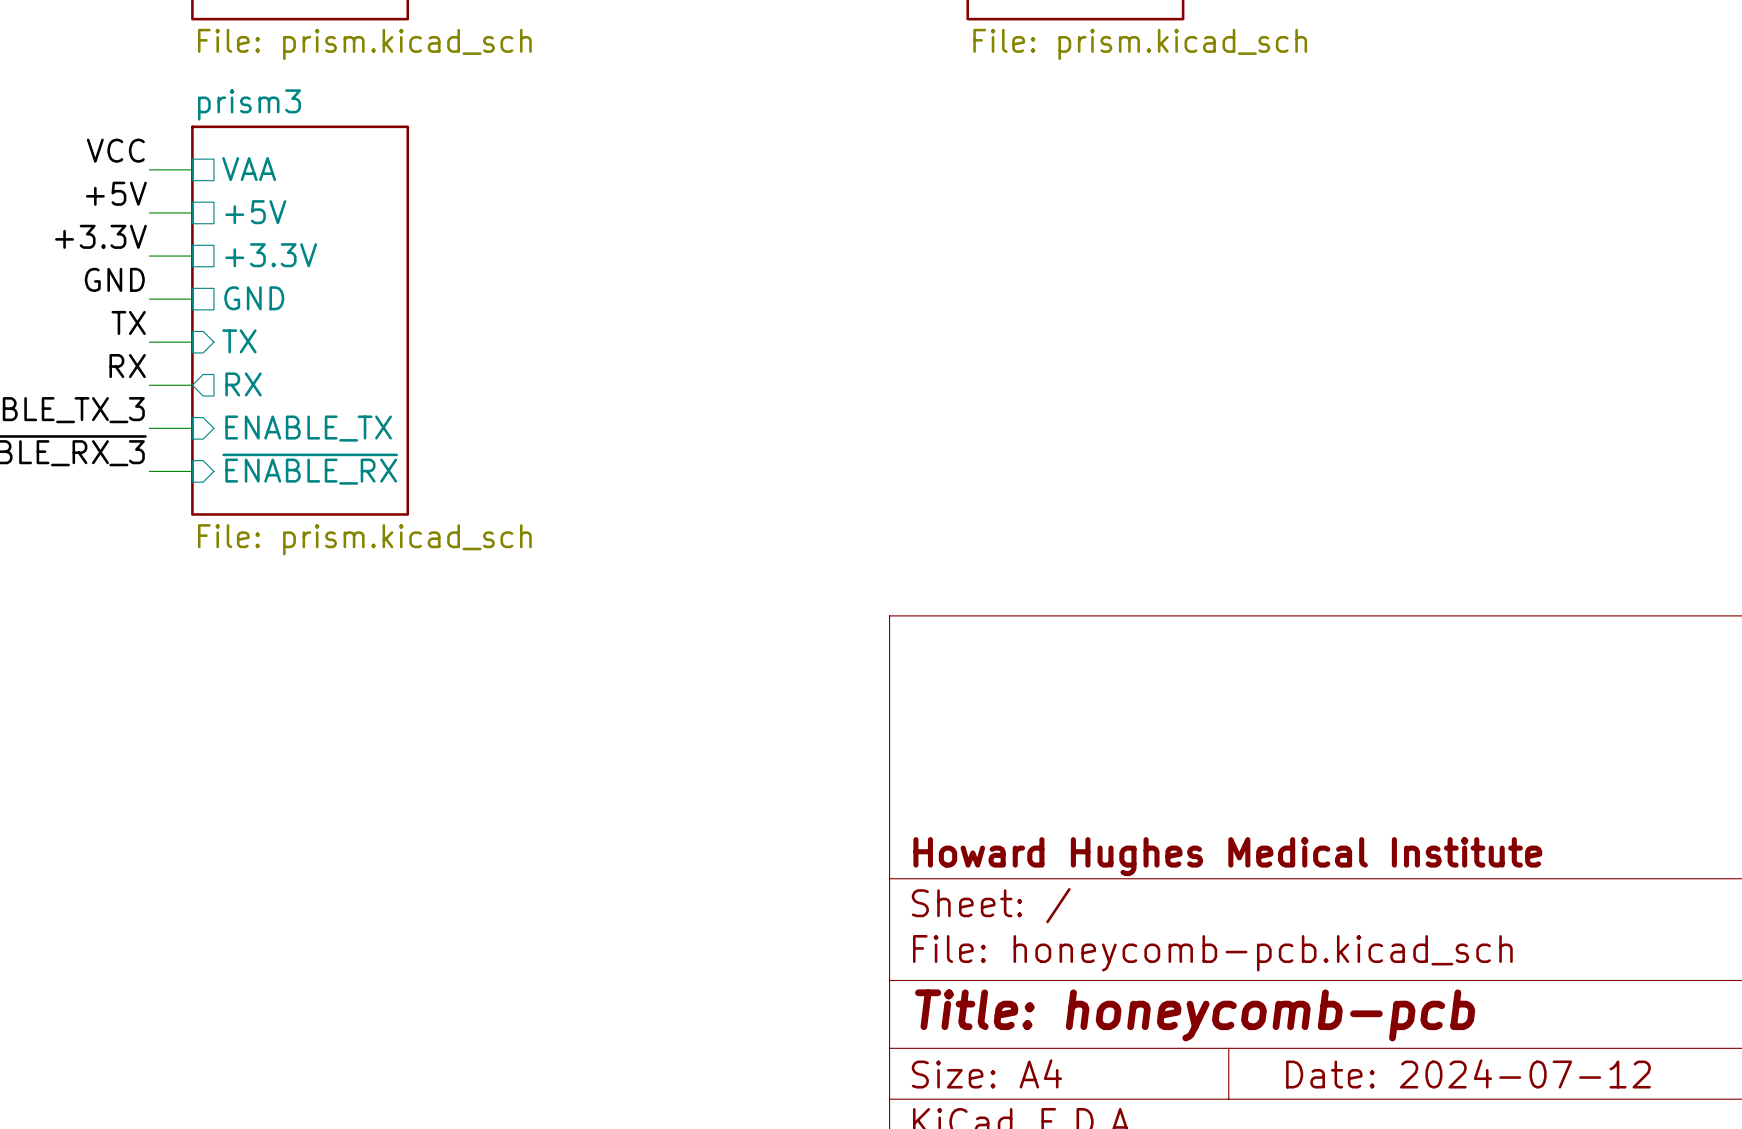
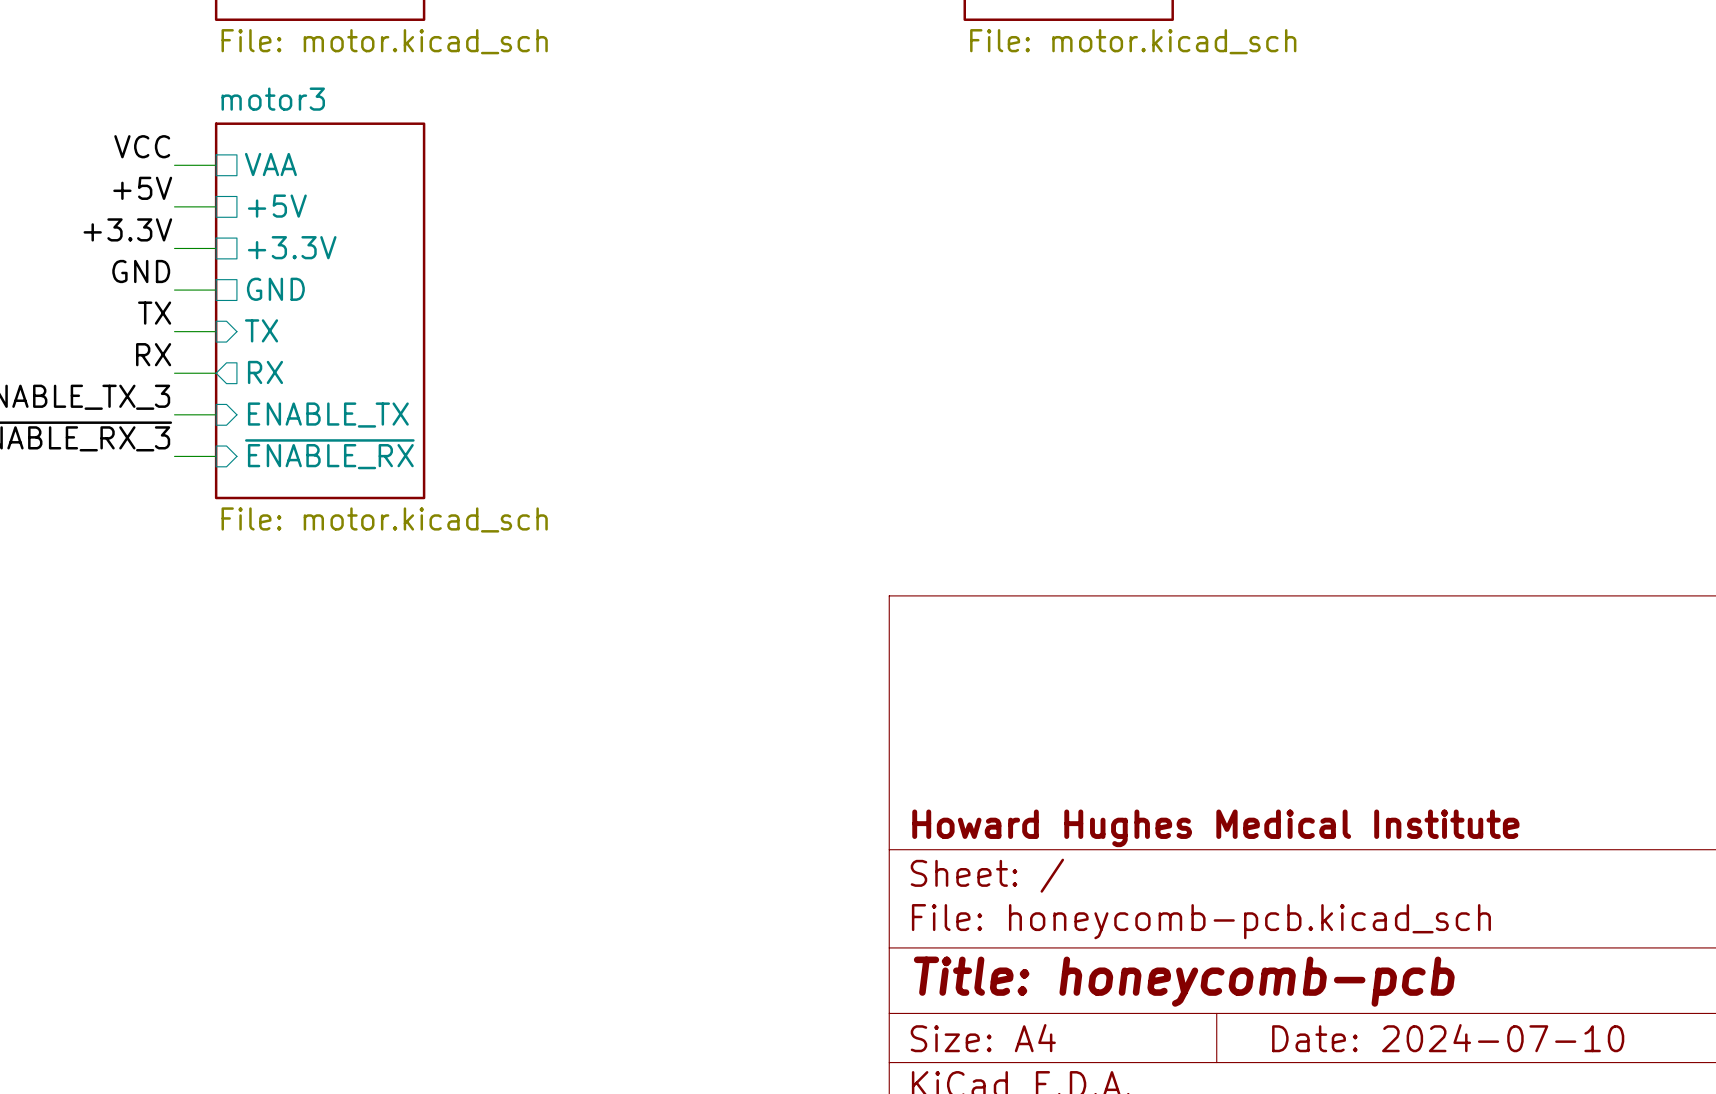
sheet value: File: prism.kicad_sch (364, 44) -> File: motor.kicad_sch (384, 41)
sheet value: File: prism.kicad_sch (1140, 44) -> File: motor.kicad_sch (1133, 41)
sheet prism3 name: prism3 (249, 104) -> motor3 (273, 99)
sheet prism3 value: File: prism.kicad_sch (364, 539) -> File: motor.kicad_sch (384, 519)
title block: Date: 2024-07-12 (1468, 1073) -> Date: 2024-07-10 (1448, 1038)

